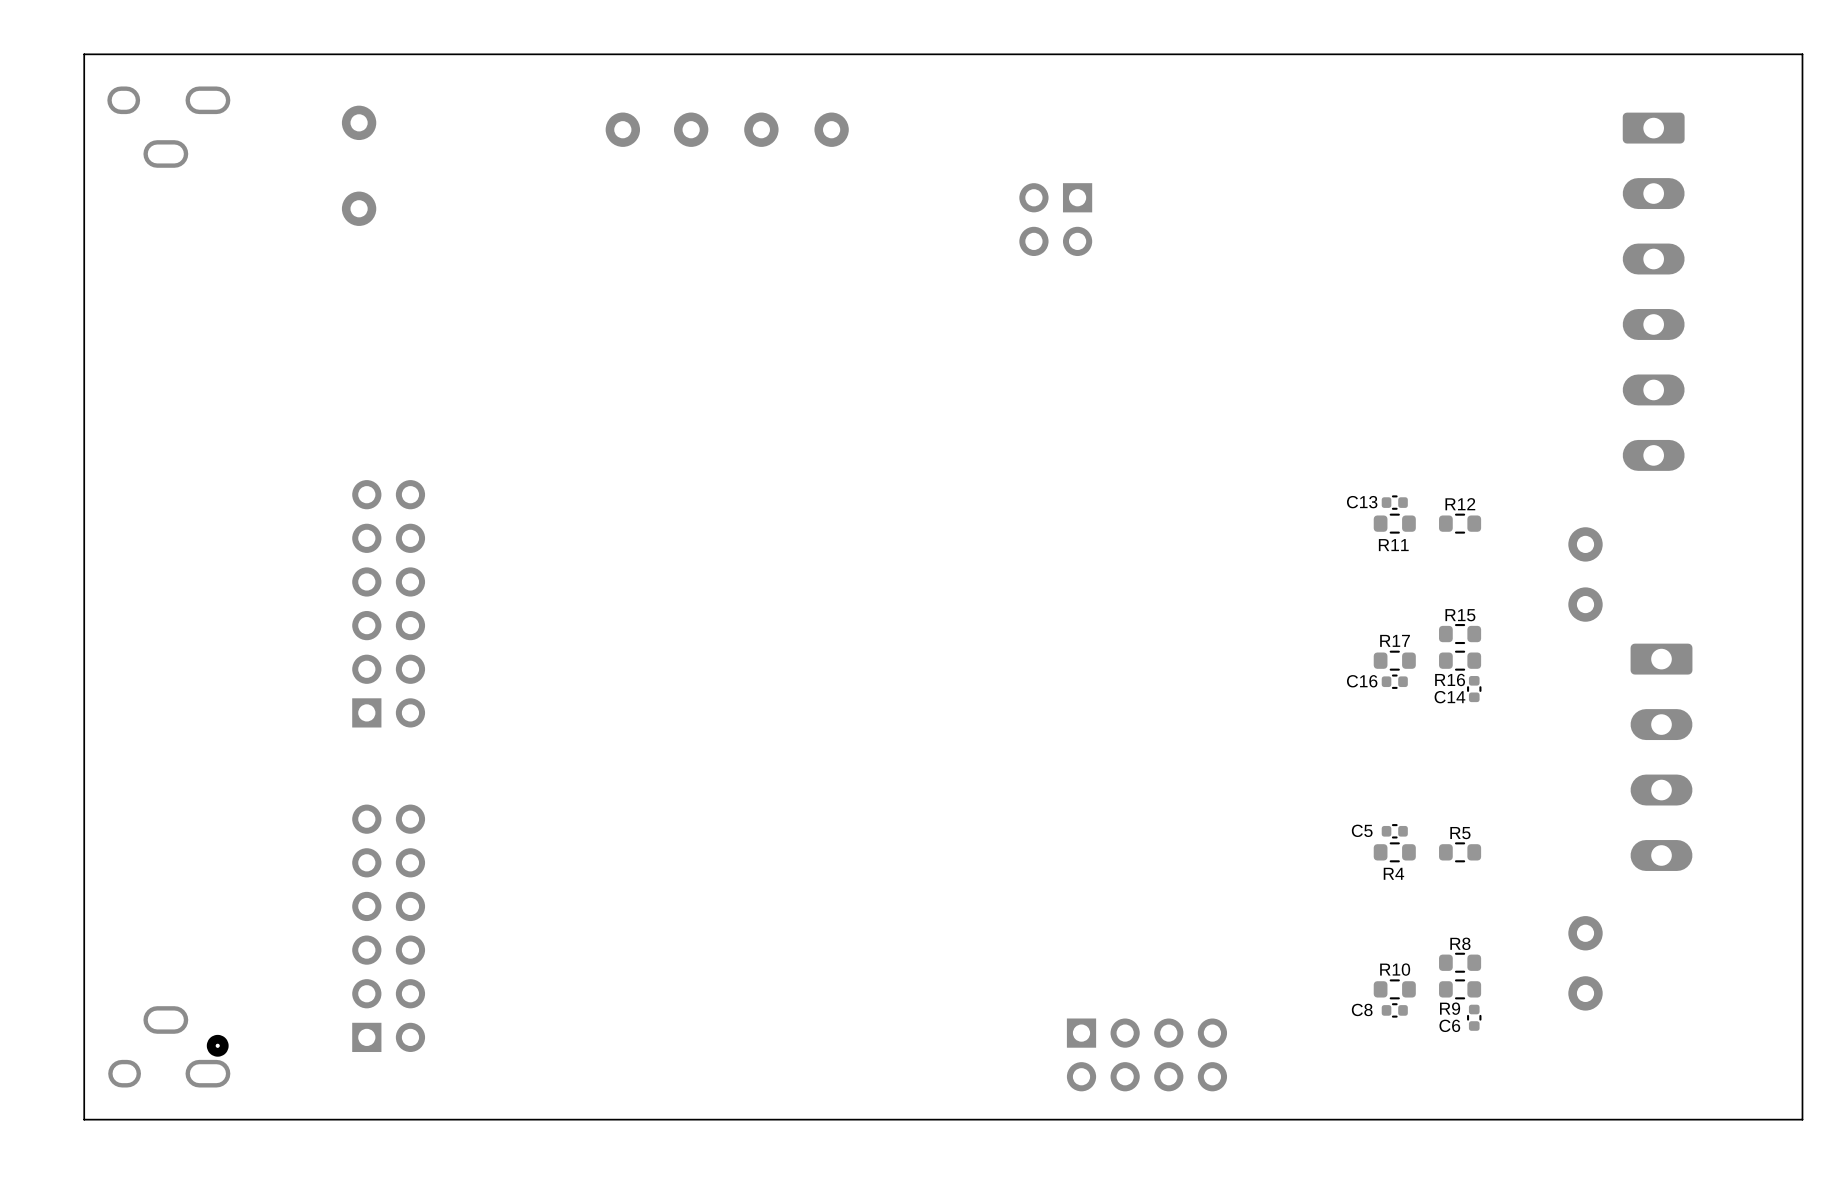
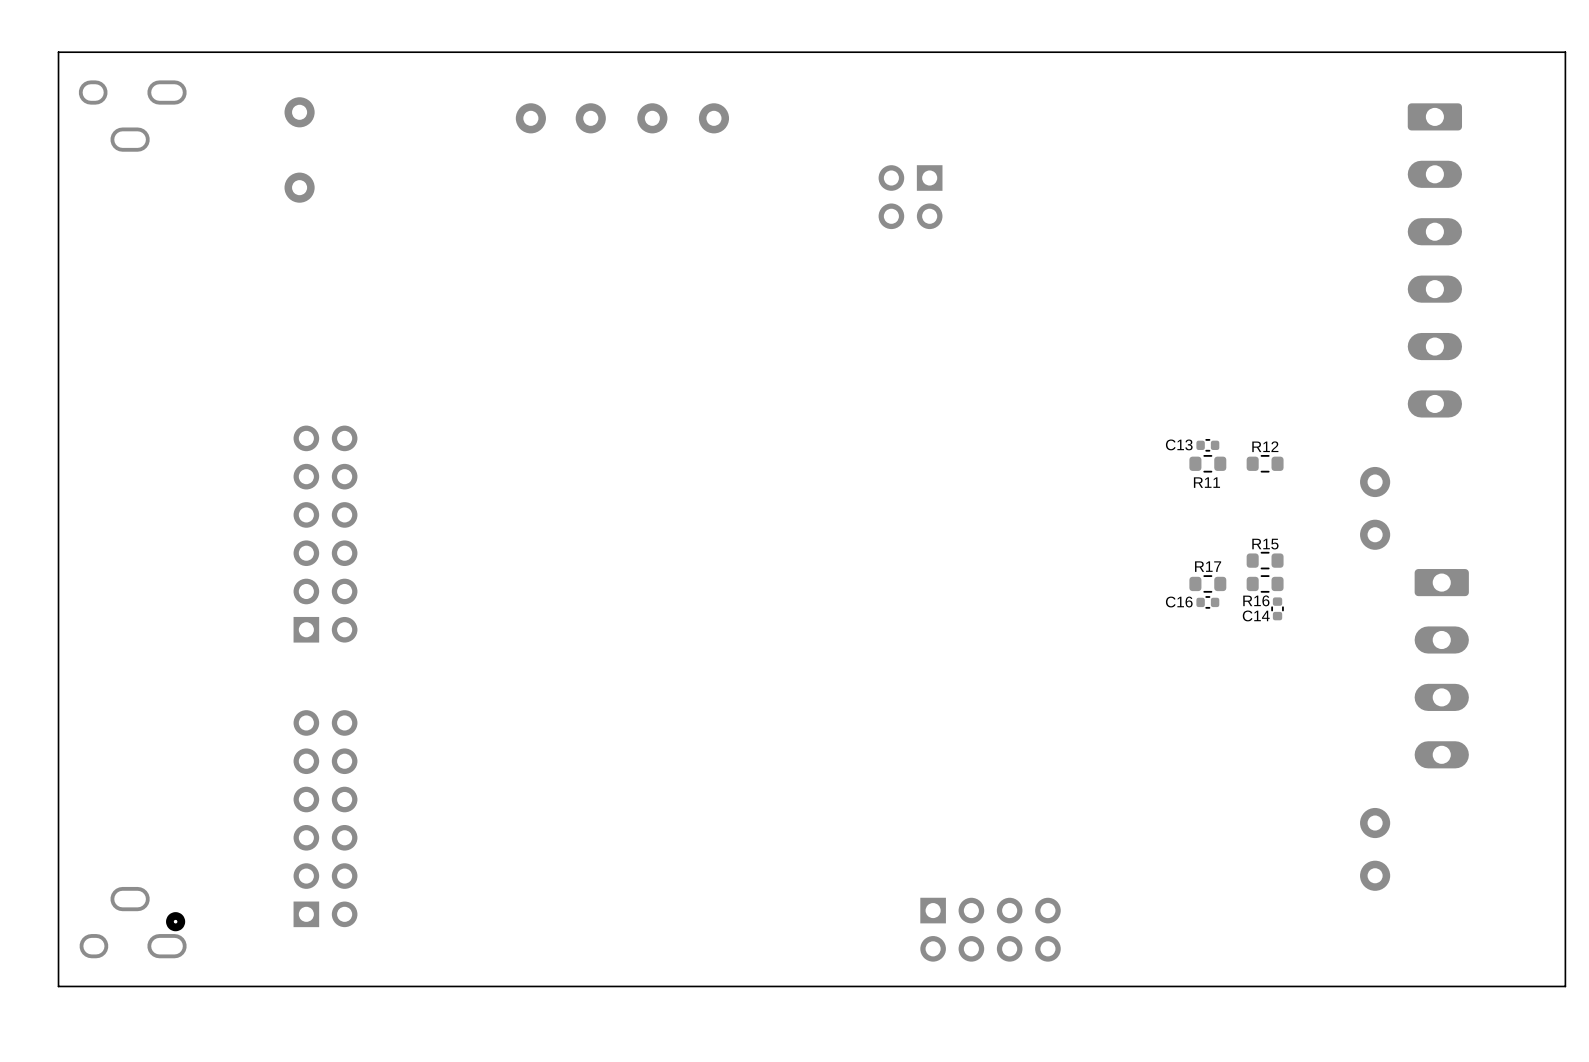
C5: (1394, 831) -> none
R4: (1394, 852) -> none
R5: (1460, 852) -> none
R8: (1460, 962) -> none
R10: (1394, 989) -> none
R9: (1460, 989) -> none
C8: (1394, 1010) -> none
C6: (1474, 1017) -> none

